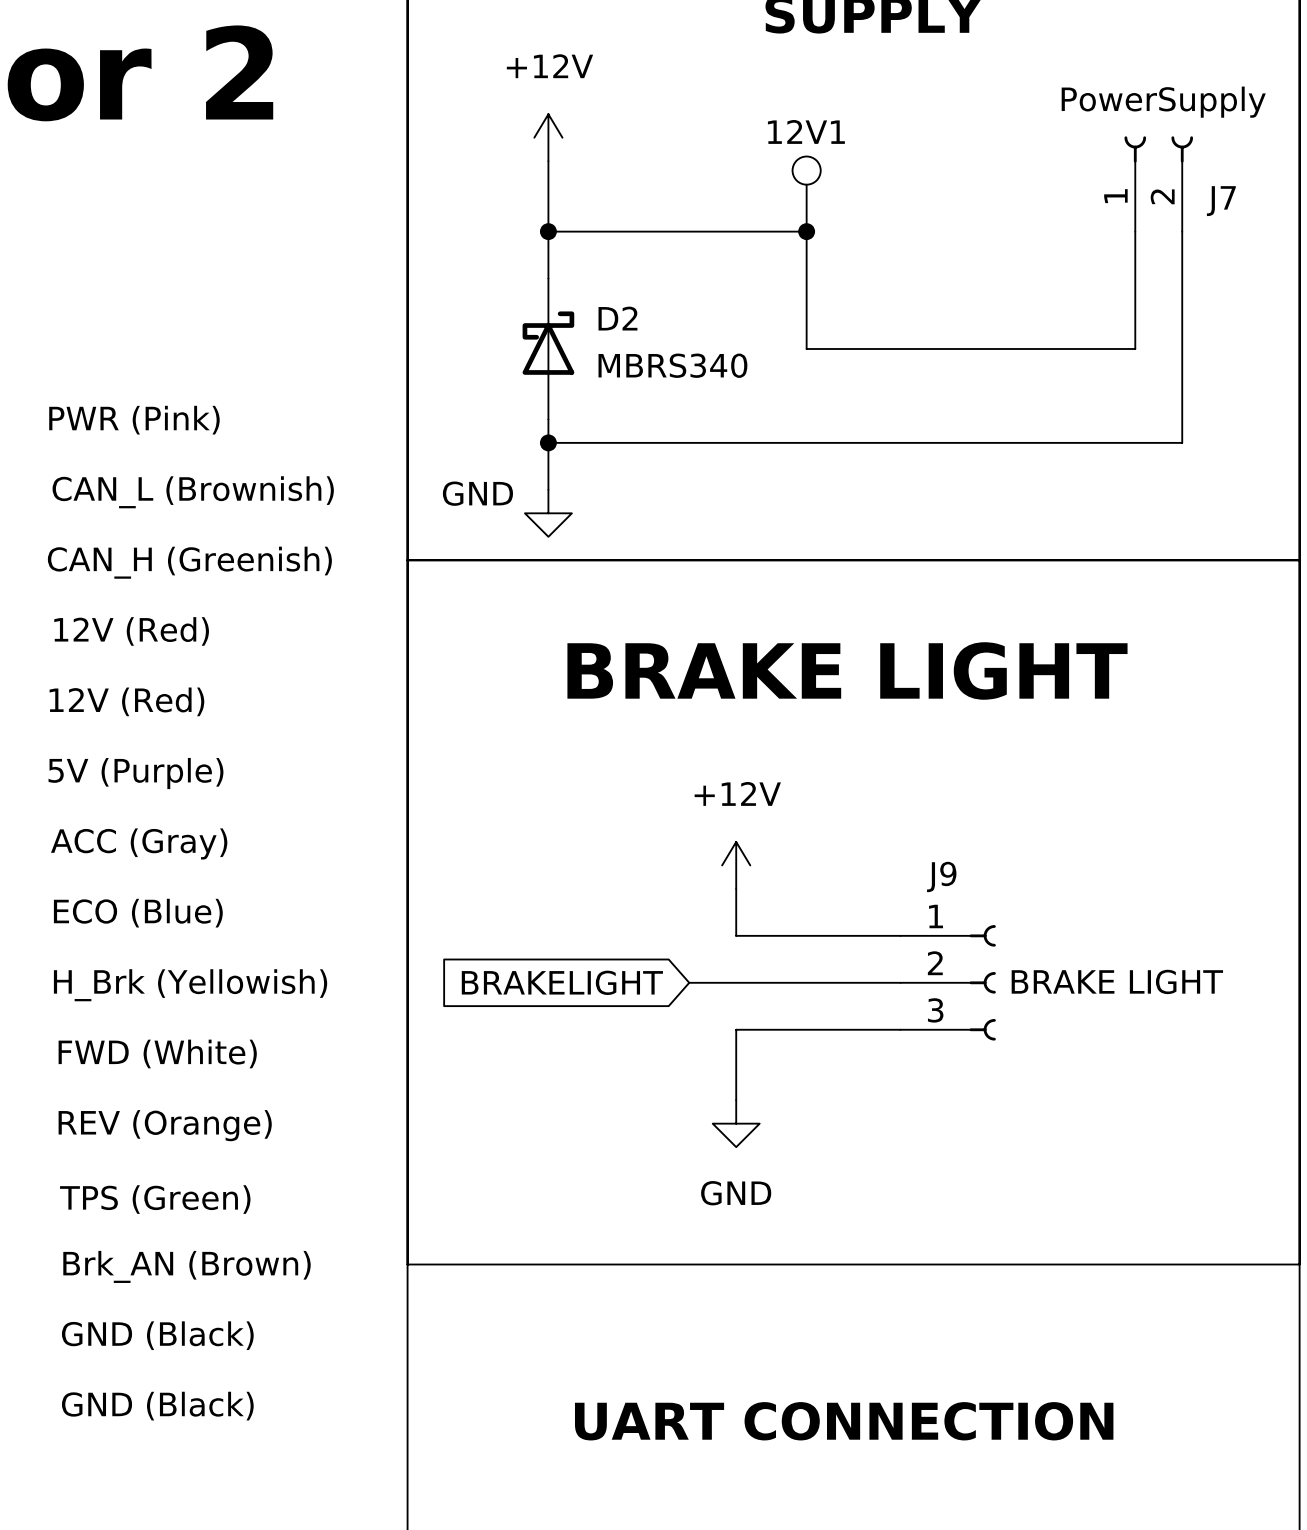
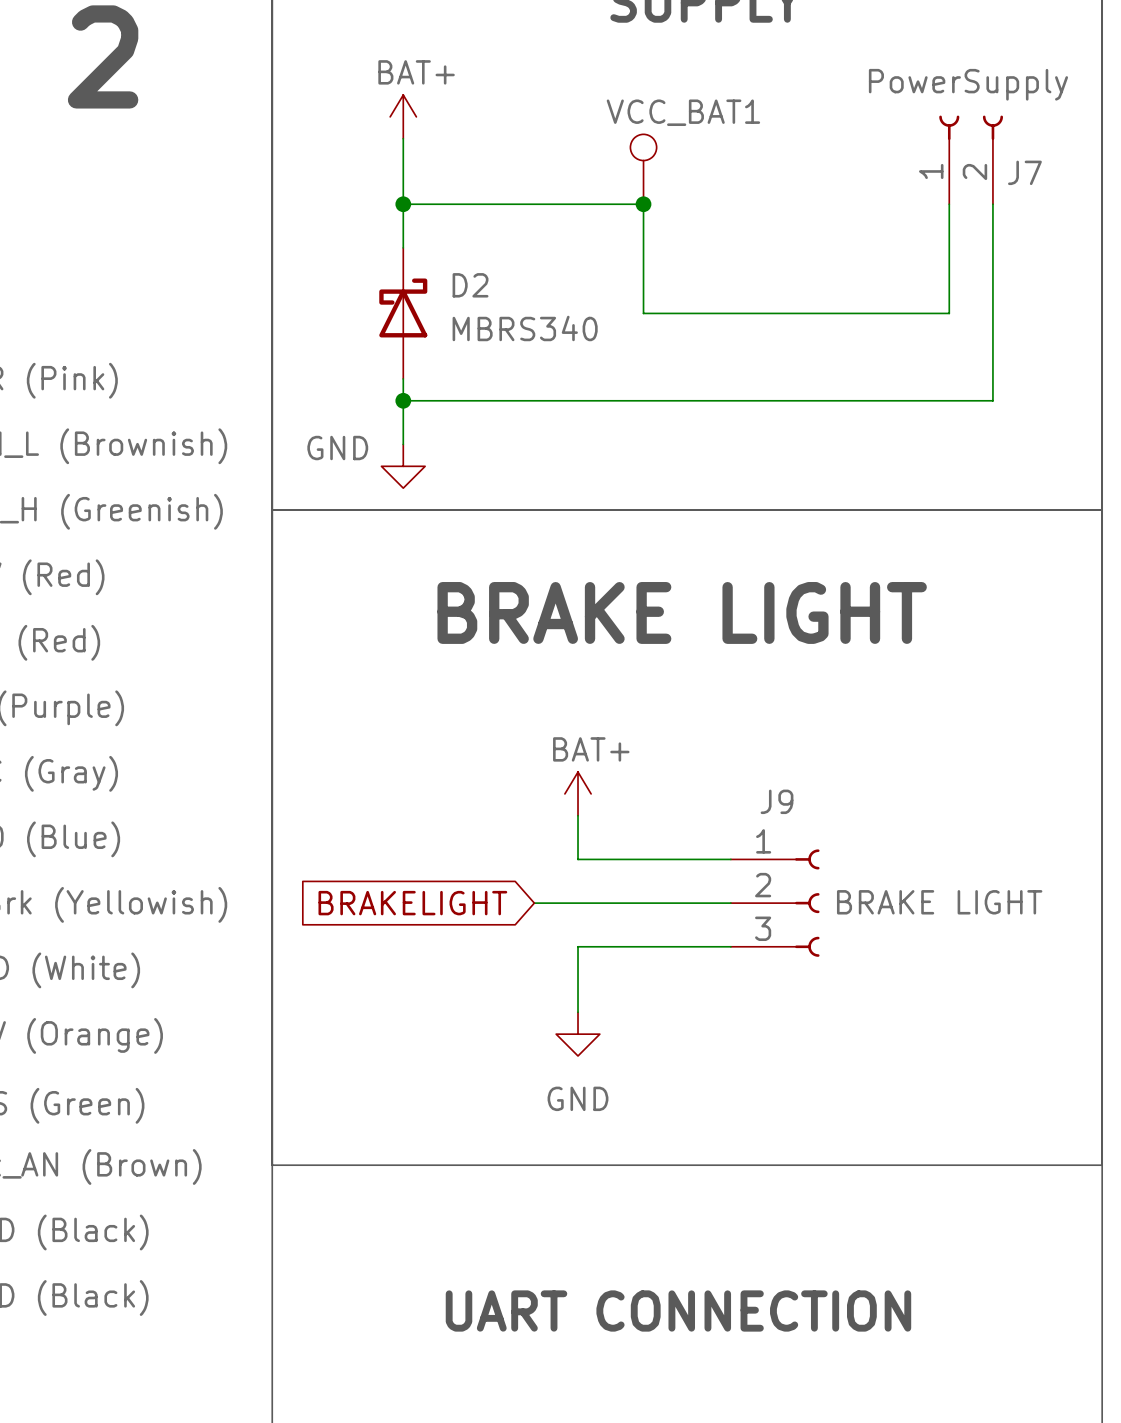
12V1 name: 12V1 (806, 131) -> VCC_BAT1 (683, 112)
power symbol: +12V (548, 137) -> BAT+ (403, 116)
power symbol: +12V (736, 865) -> BAT+ (578, 793)

